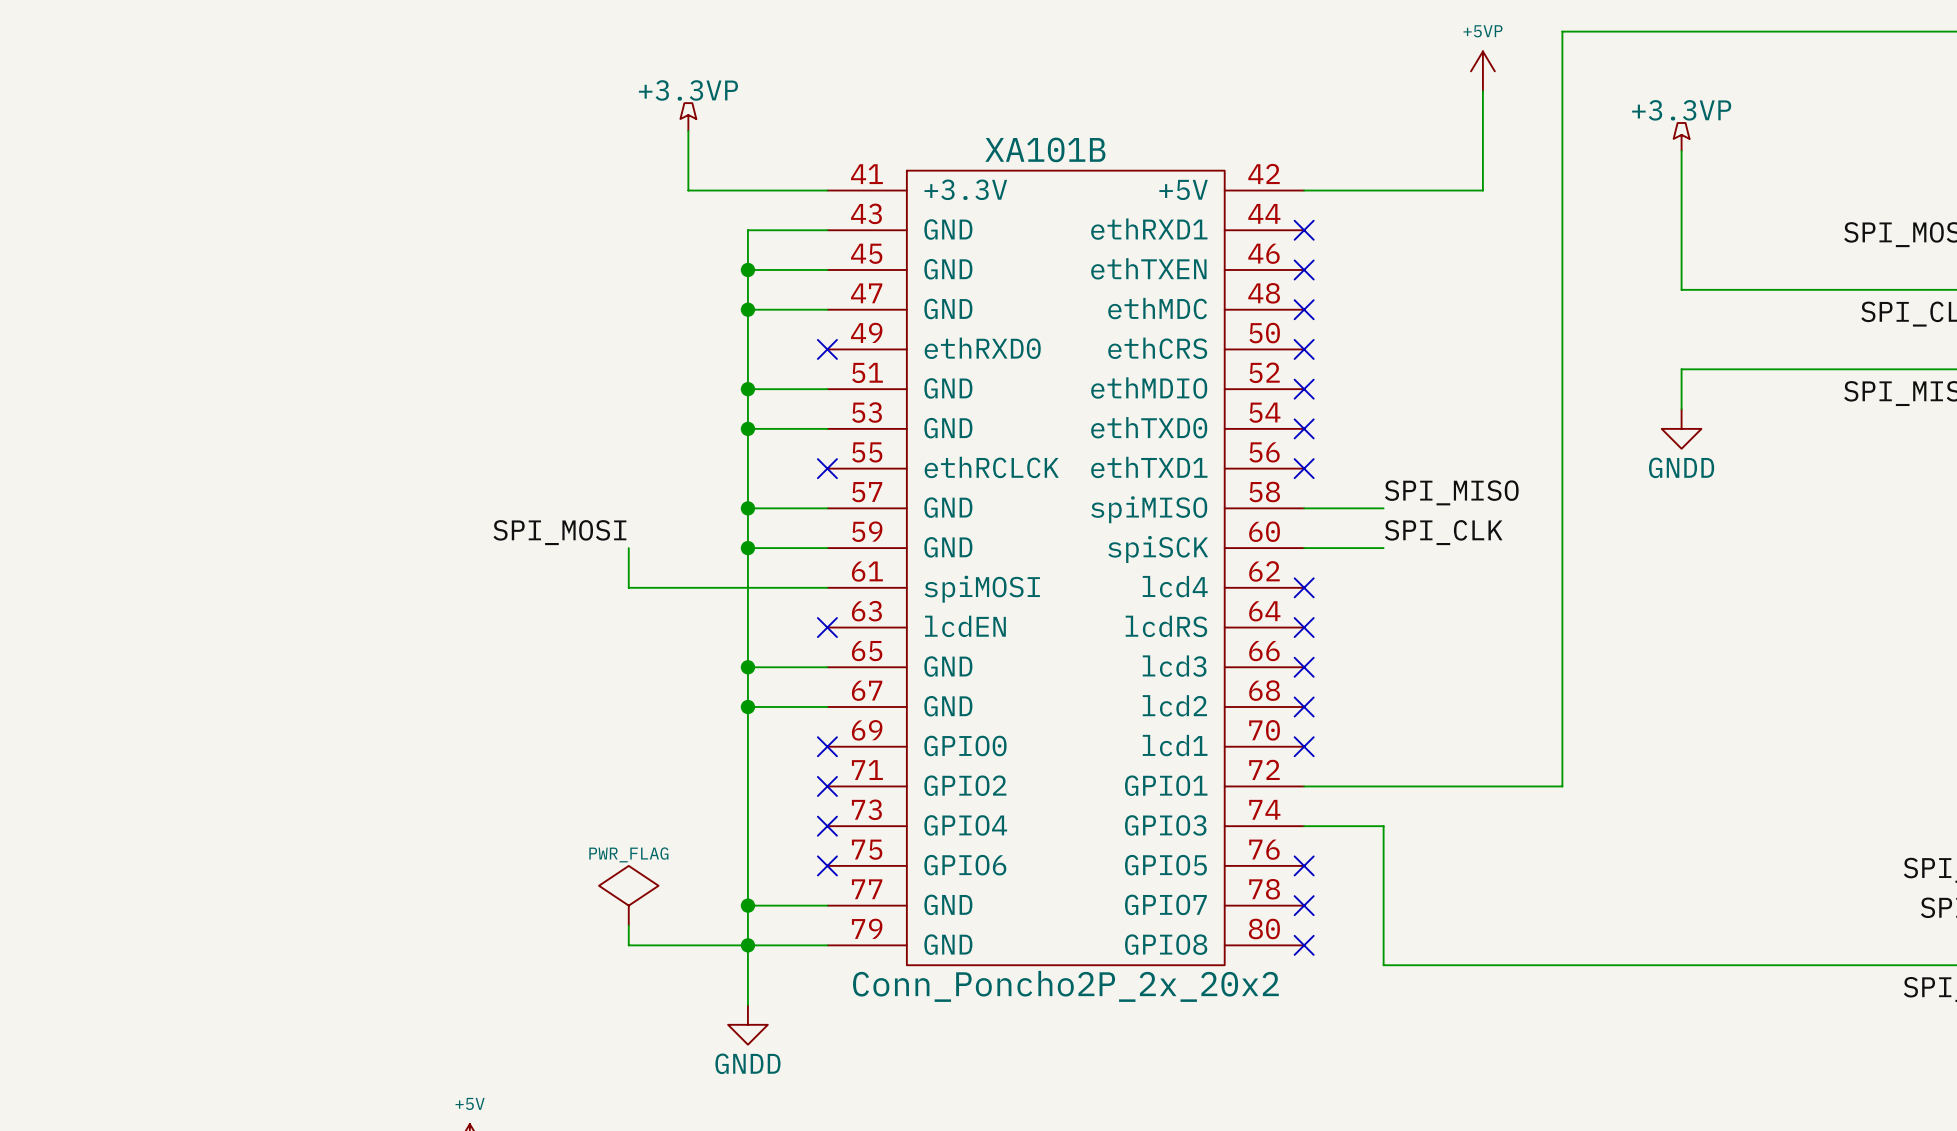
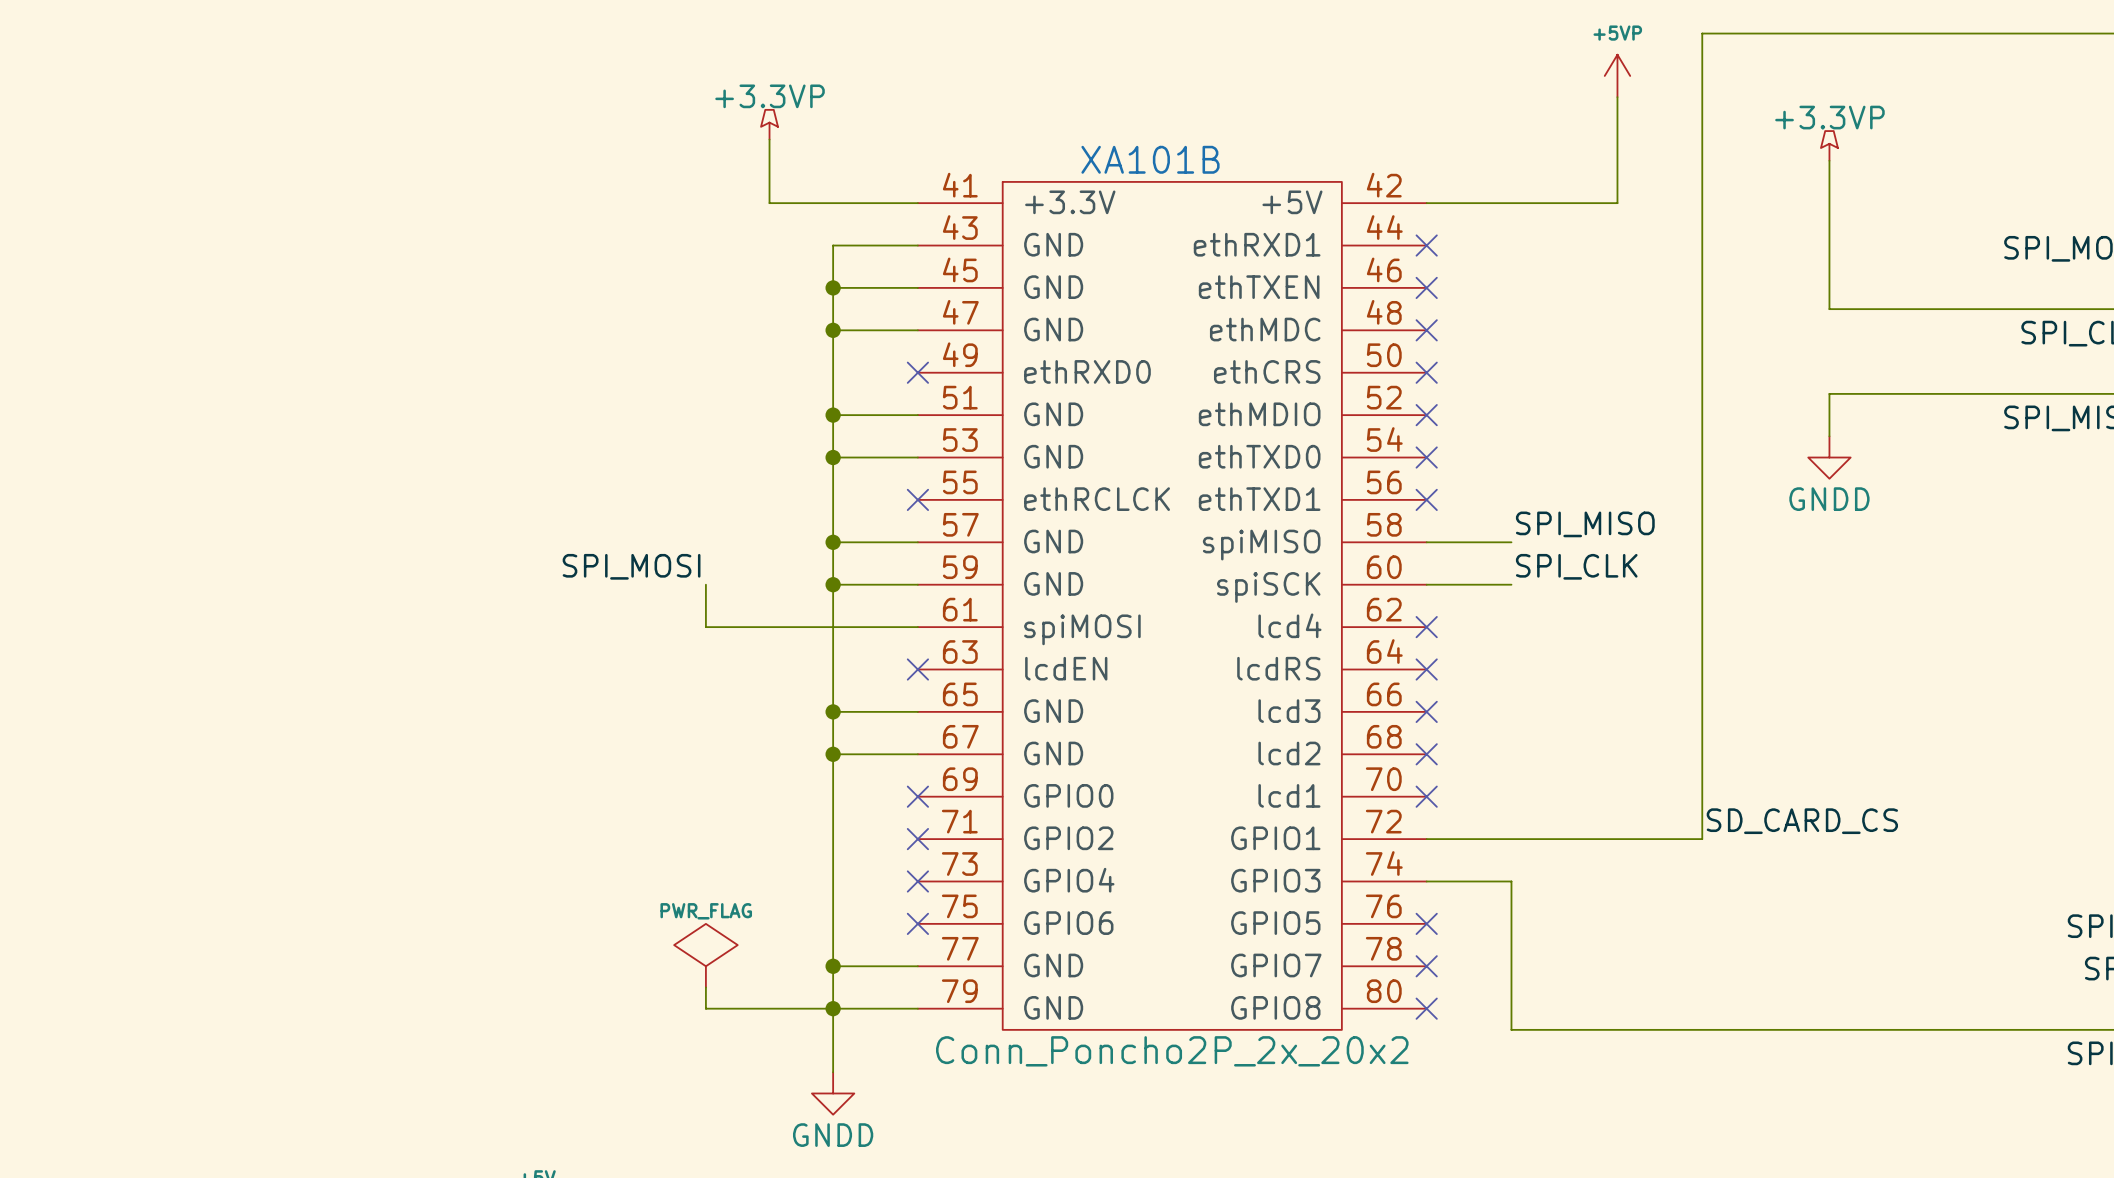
label: none -> SD_CARD_CS (1802, 821)

